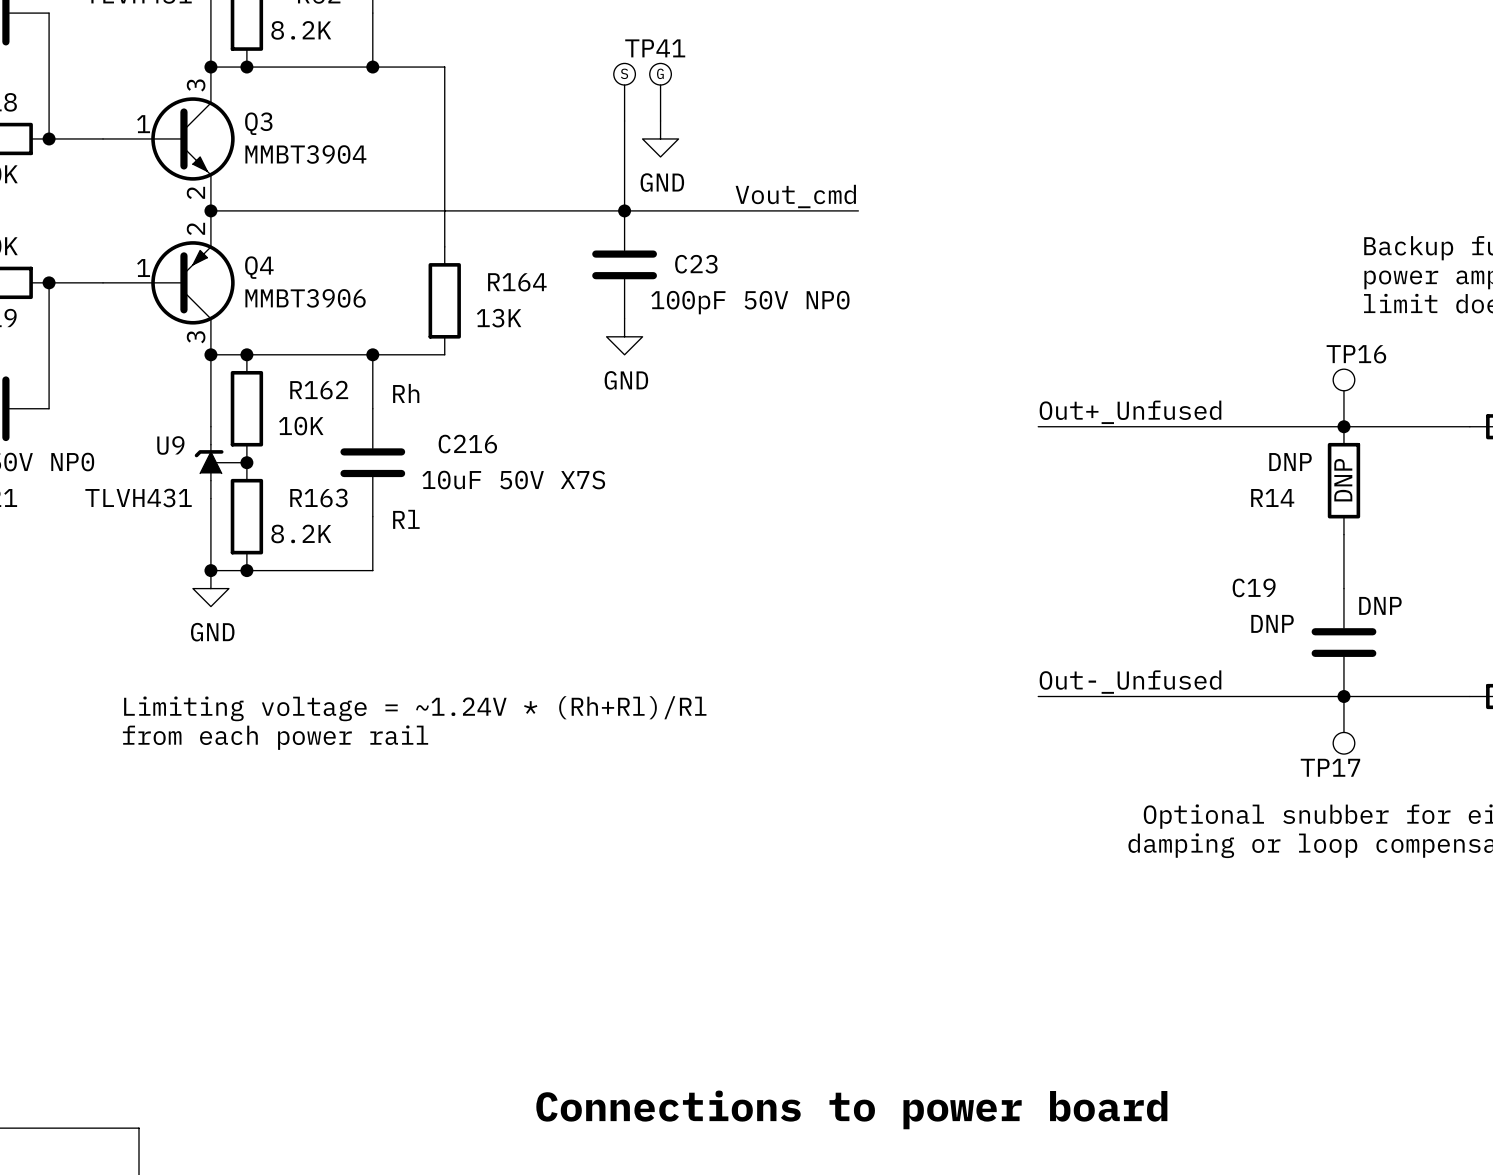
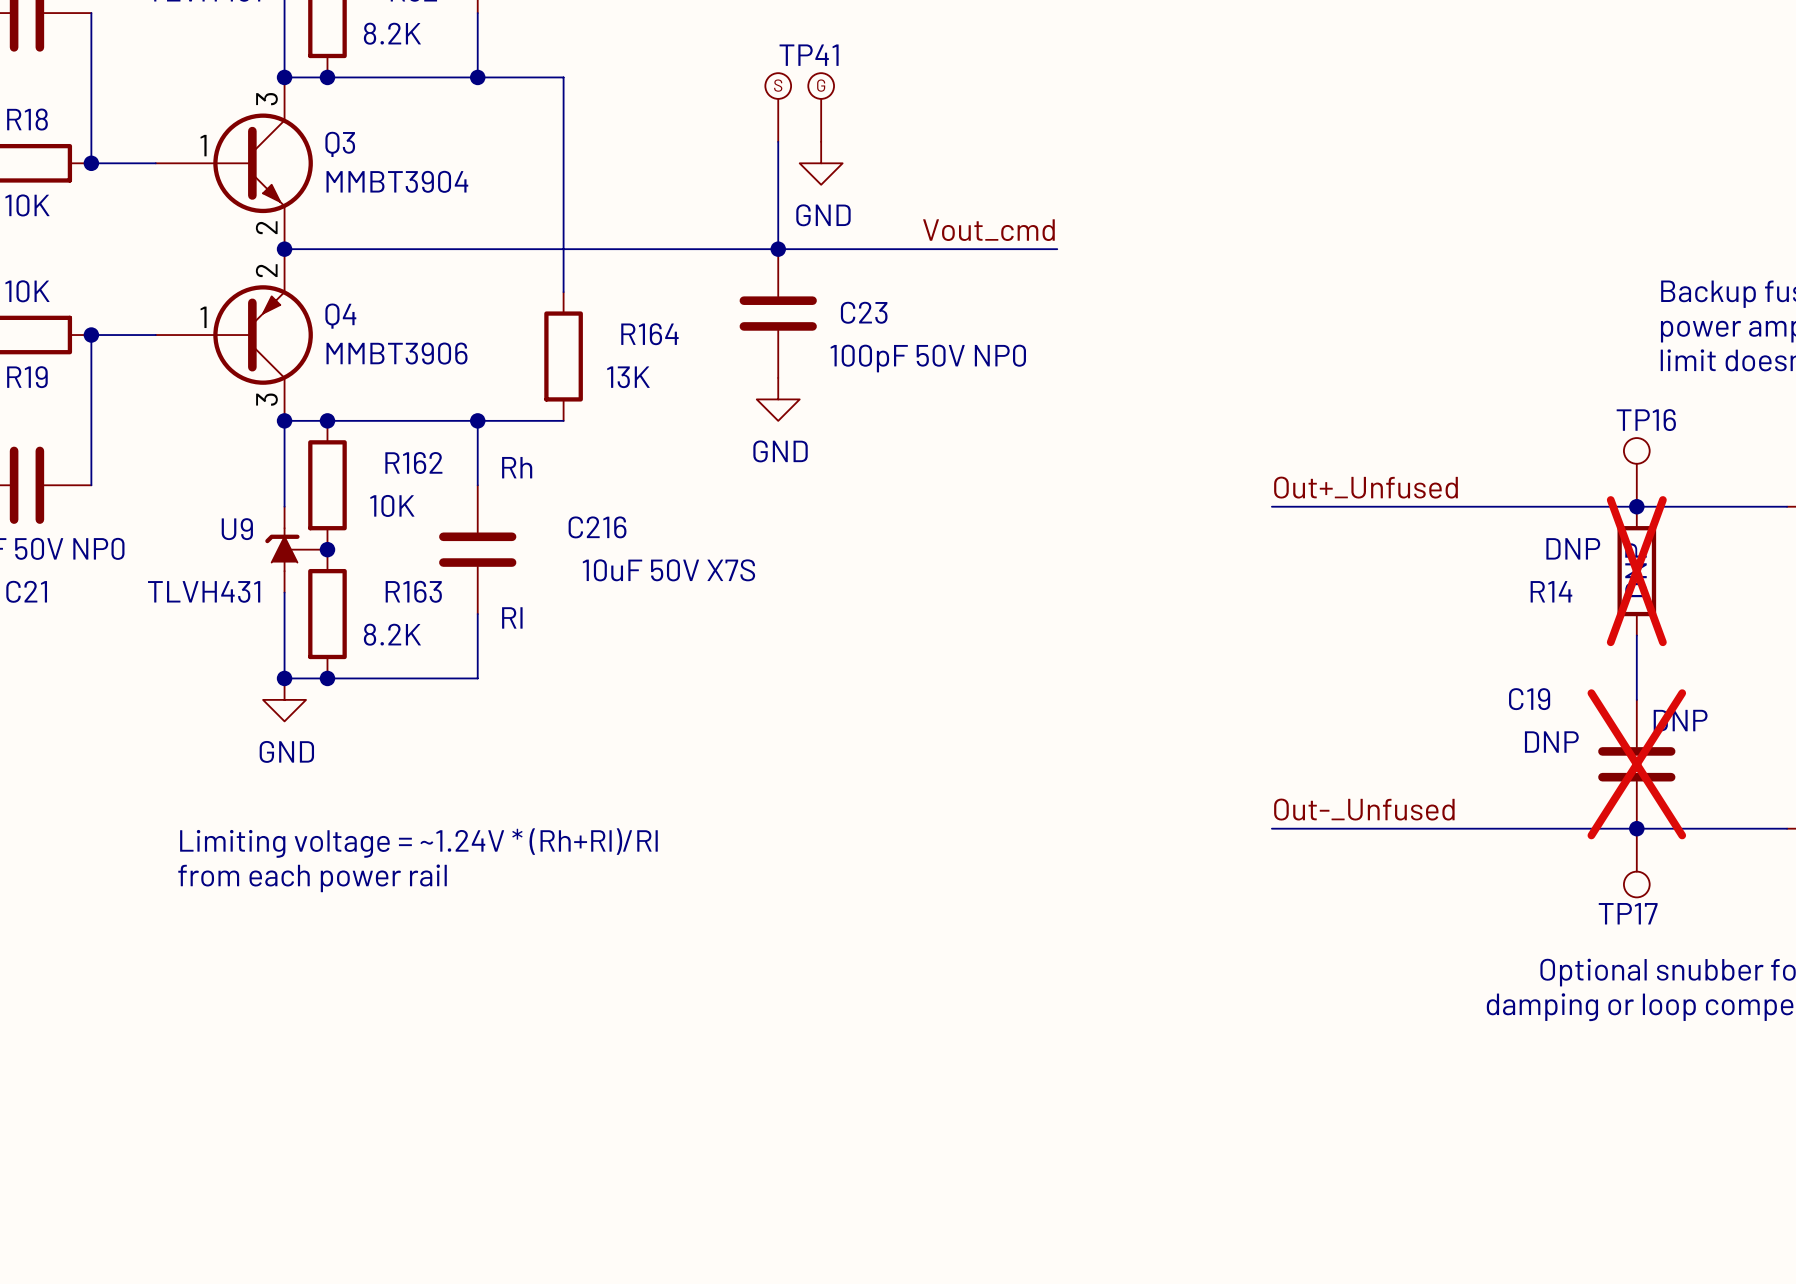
R14 do-not-place cross: none -> (1636, 571)
C19 do-not-place cross: none -> (1636, 764)

